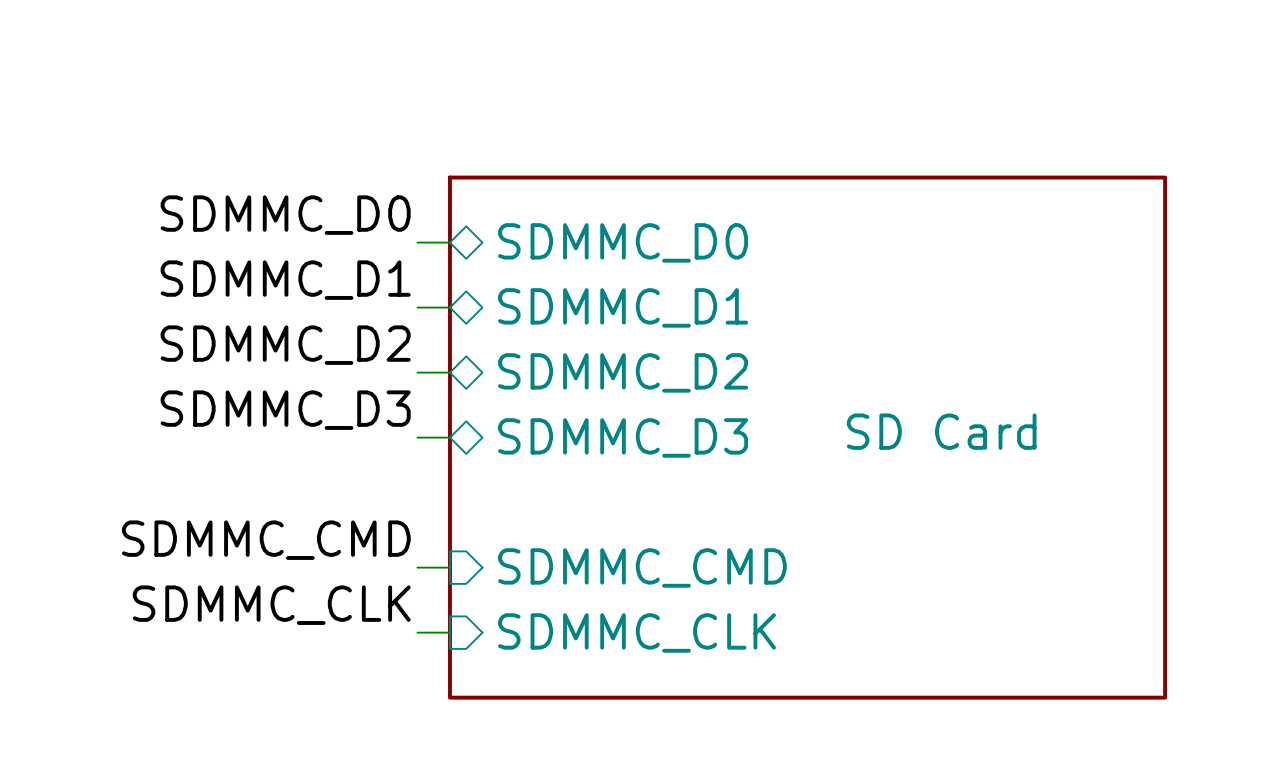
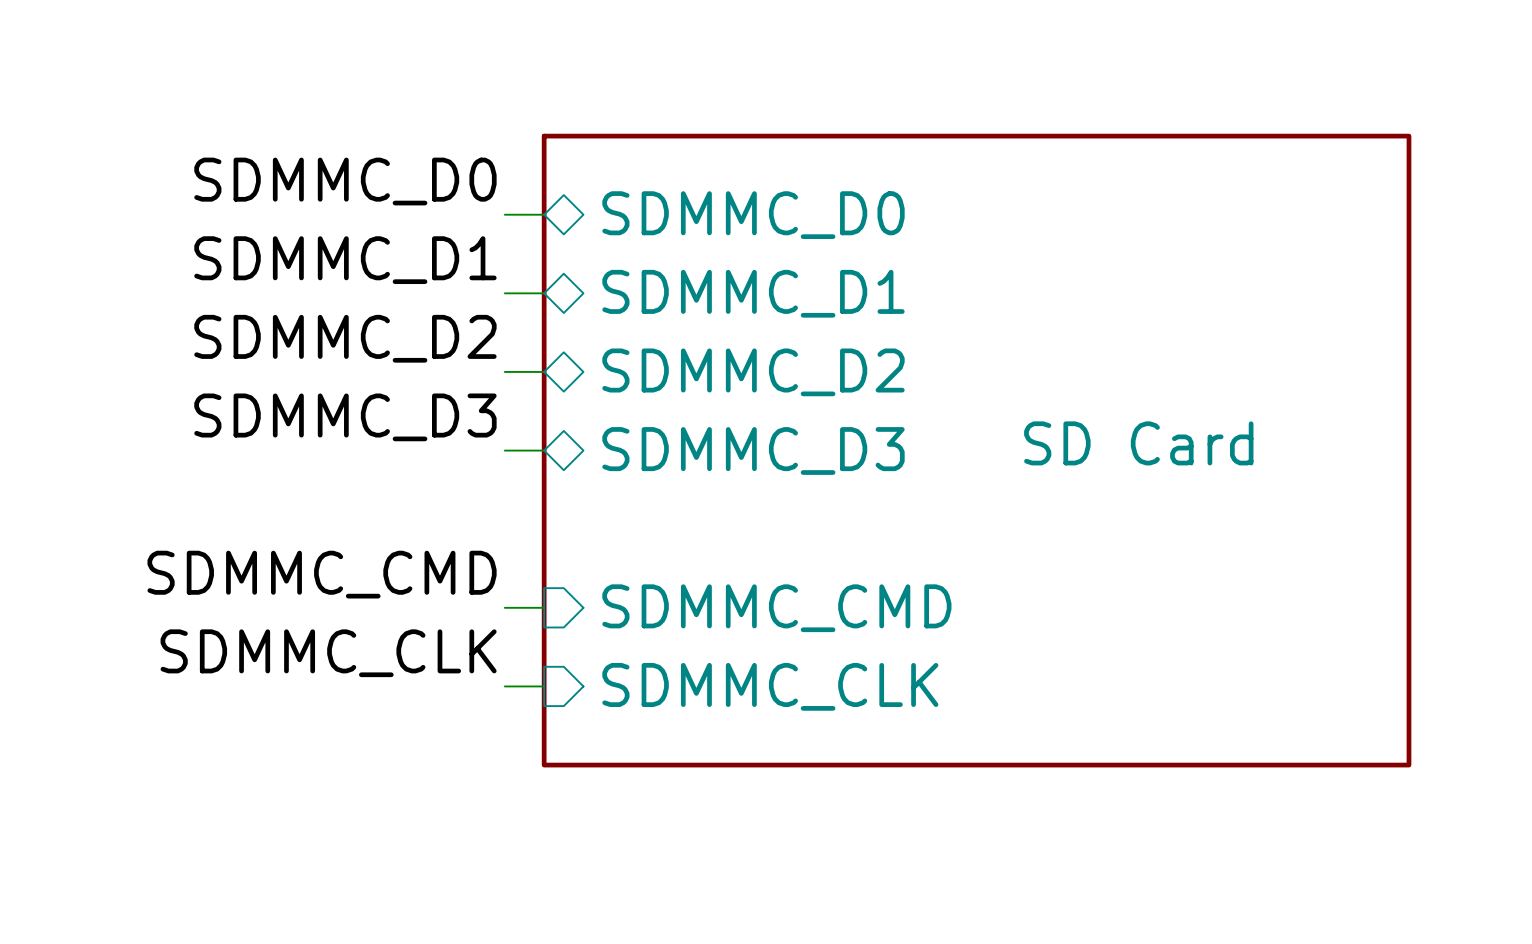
label: none -> SDMMC_D0 (345, 181)
sheet pin: none -> SDMMC_D0 (753, 215)
label: SDMMC_D0 (285, 215) -> SDMMC_D1 (345, 260)
sheet pin: SDMMC_D0 (623, 242) -> SDMMC_D1 (753, 293)
label: SDMMC_D1 (285, 280) -> SDMMC_D2 (345, 338)
sheet pin: SDMMC_D1 (623, 307) -> SDMMC_D2 (753, 372)
label: SDMMC_D2 (285, 345) -> SDMMC_D3 (345, 417)
sheet pin: SDMMC_D2 (623, 372) -> SDMMC_D3 (753, 450)
label: SDMMC_D3 (285, 410) -> SDMMC_CMD (322, 574)
wire: (417, 437) (449, 437) -> (504, 607) (544, 607)
sheet pin shape: bidirectional (623, 437) -> input (776, 608)
sheet pin: SDMMC_D3 (623, 437) -> SDMMC_CMD (776, 608)
sheet SD Card position: (807, 437) -> (976, 450)
label: SDMMC_CMD (266, 540) -> SDMMC_CLK (328, 653)
sheet pin: SDMMC_CMD (642, 567) -> SDMMC_CLK (770, 686)
label: SDMMC_CLK (271, 605) -> none
wire: (417, 632) (449, 632) -> (504, 214) (544, 214)
sheet pin: SDMMC_CLK (637, 632) -> none

